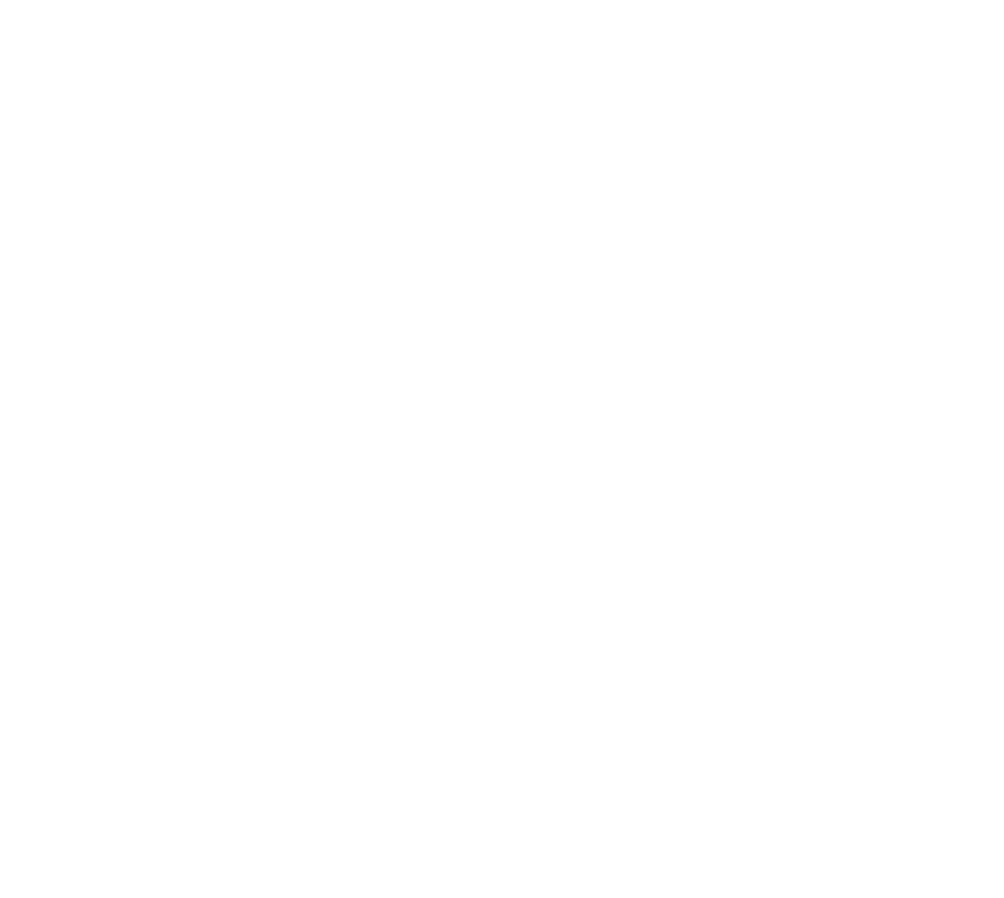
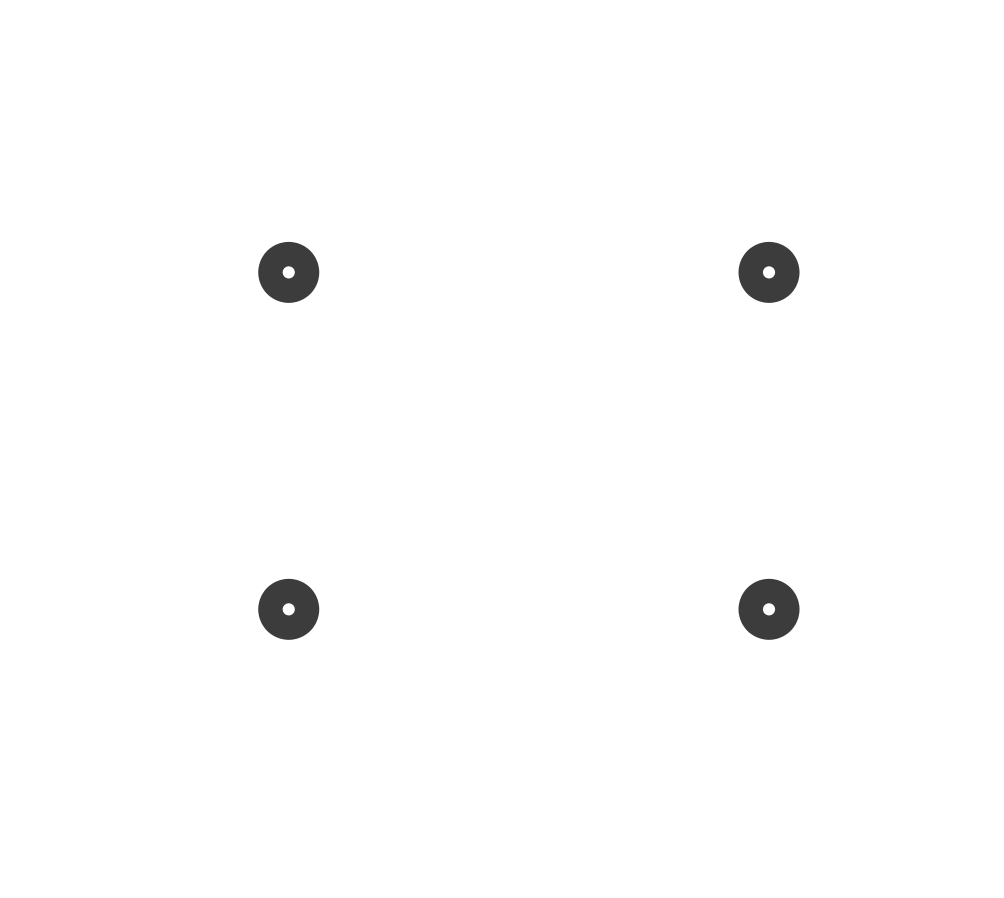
part: none -> (288, 272)
part: none -> (769, 272)
part: none -> (288, 609)
part: none -> (769, 609)

